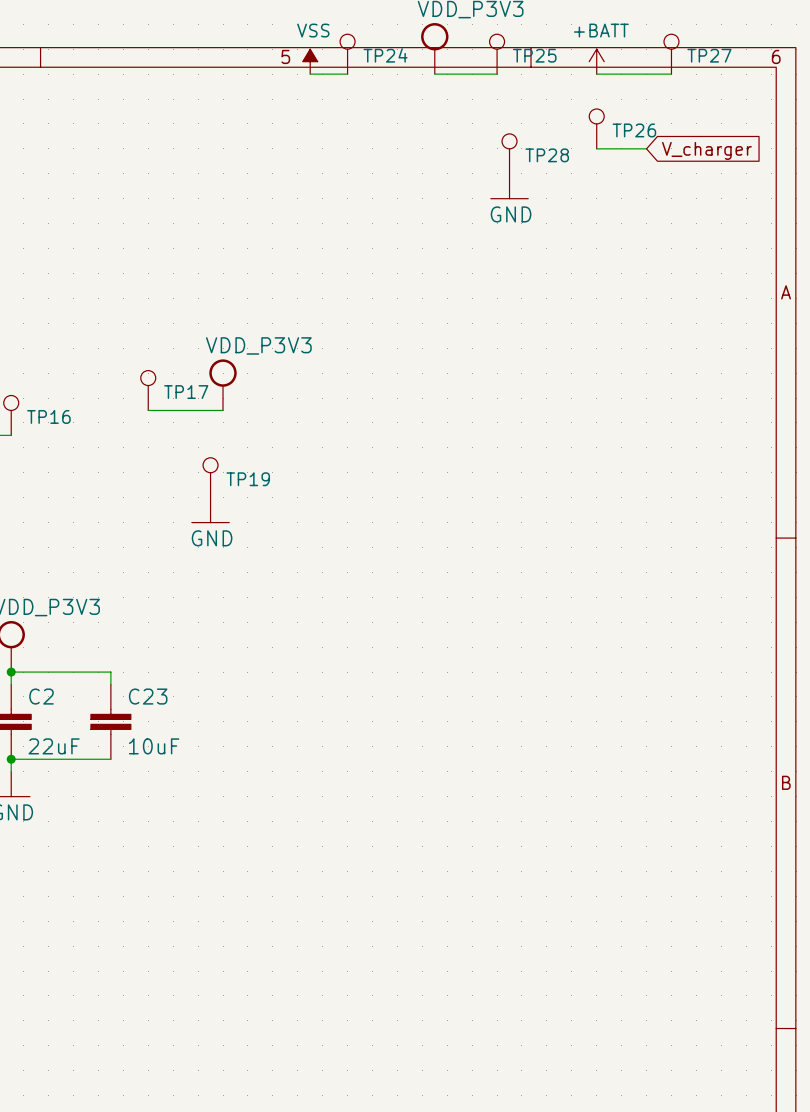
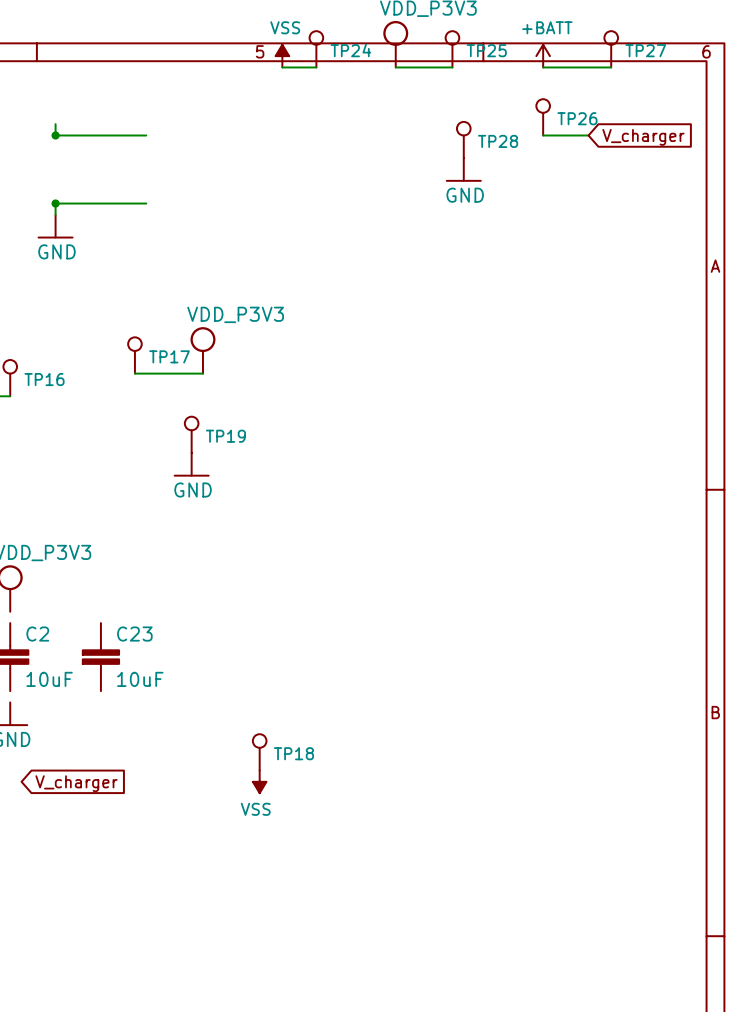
wire: none -> (55, 124) (55, 135) (146, 135)
junction: none -> (55, 135)
junction: none -> (55, 203)
wire: none -> (146, 203) (55, 203) (55, 214)
power symbol: none -> GND (55, 226)
junction: (11, 672) -> none
wire: (11, 684) (11, 672) (110, 672) (110, 684) -> none
C2 value: 22uF (54, 746) -> 10uF (49, 679)
junction: (11, 759) -> none
wire: (110, 759) (11, 759) (11, 771) -> none
TP18: none -> (259, 752)
power symbol: none -> VSS (259, 781)
global label: none -> V_charger (76, 783)

